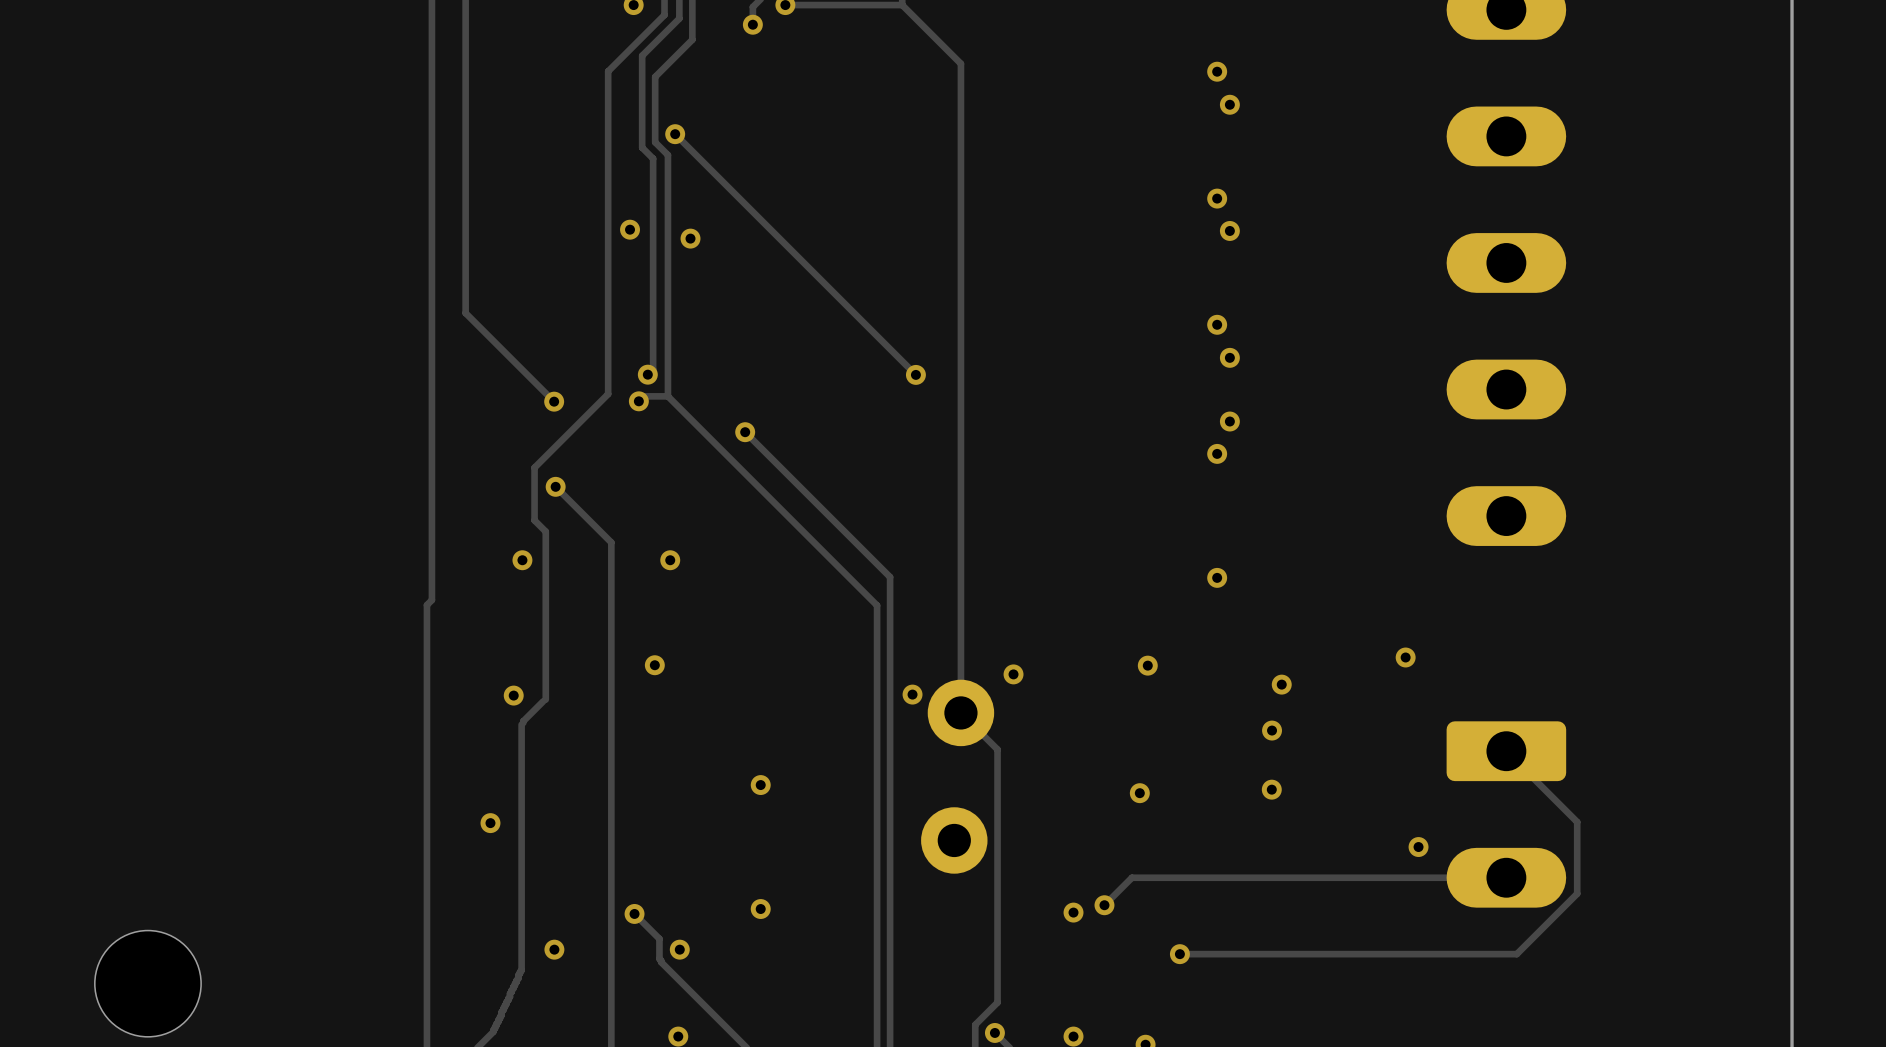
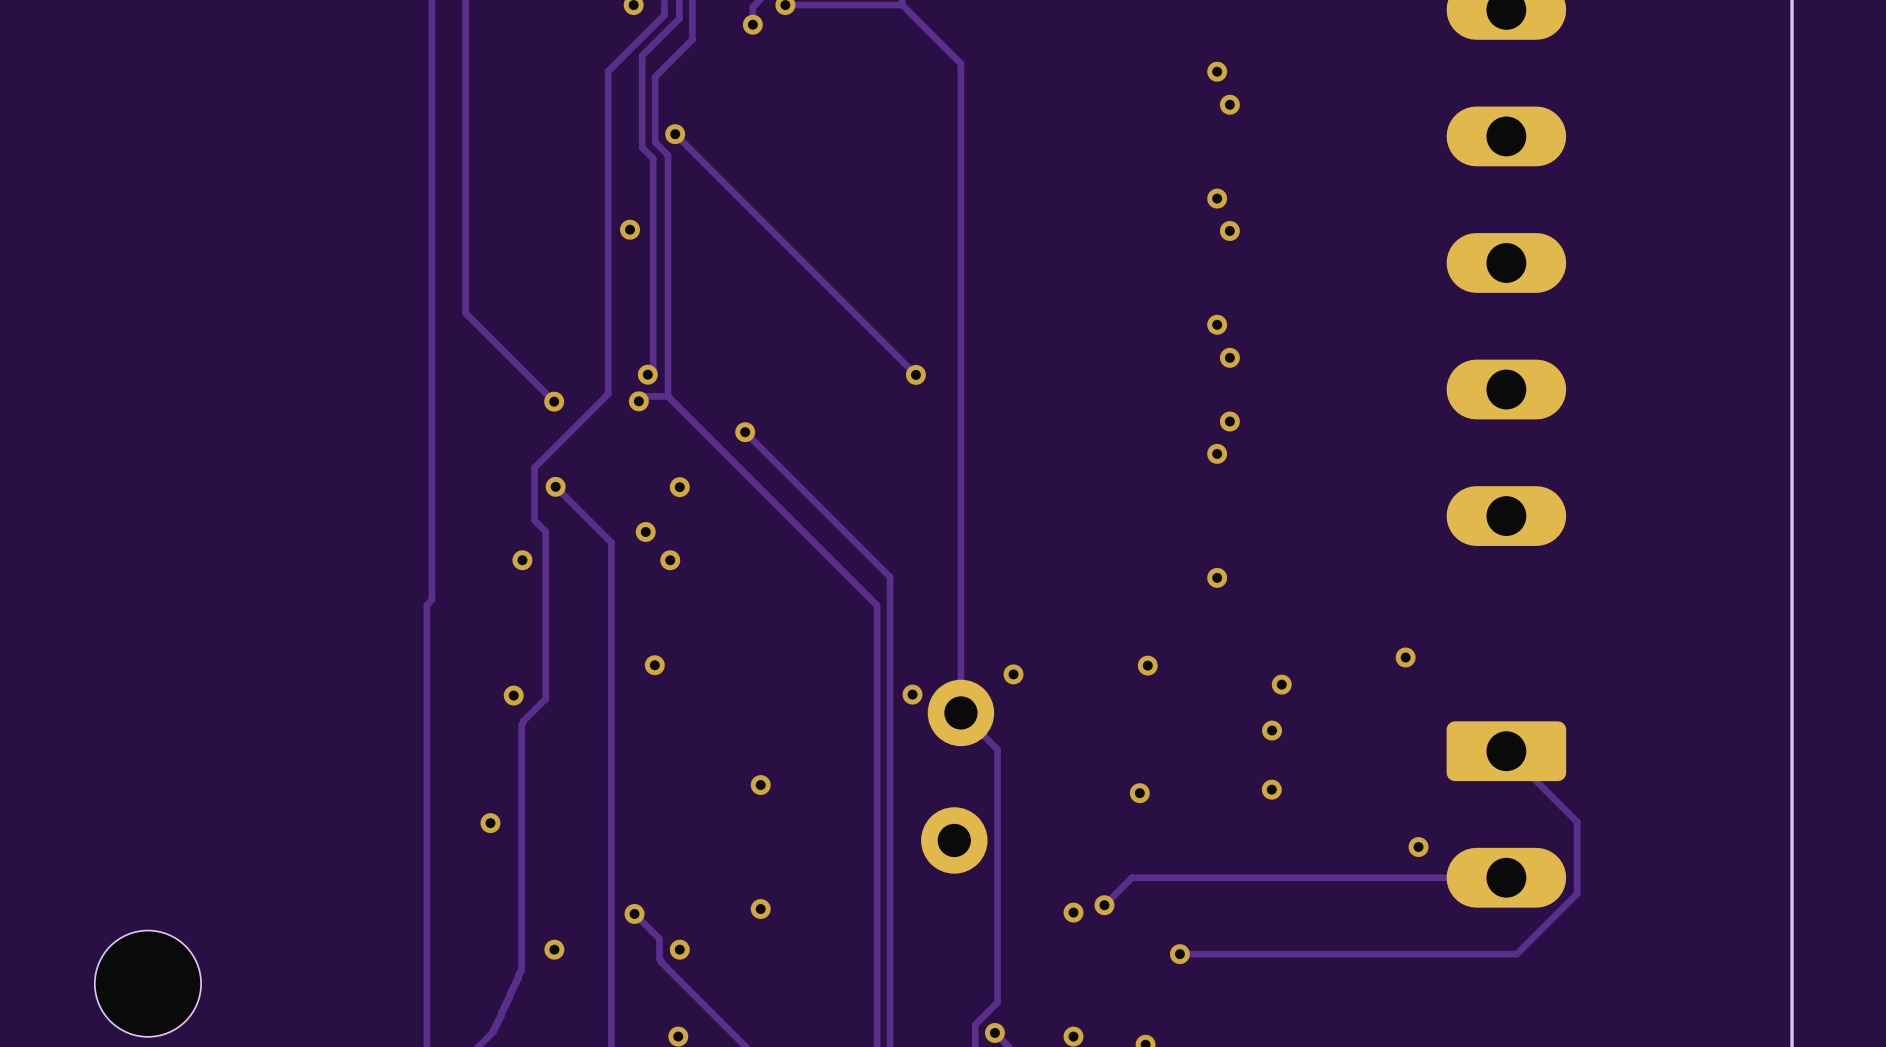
via: (690, 238) -> none
via: none -> (679, 487)
via: none -> (645, 532)

